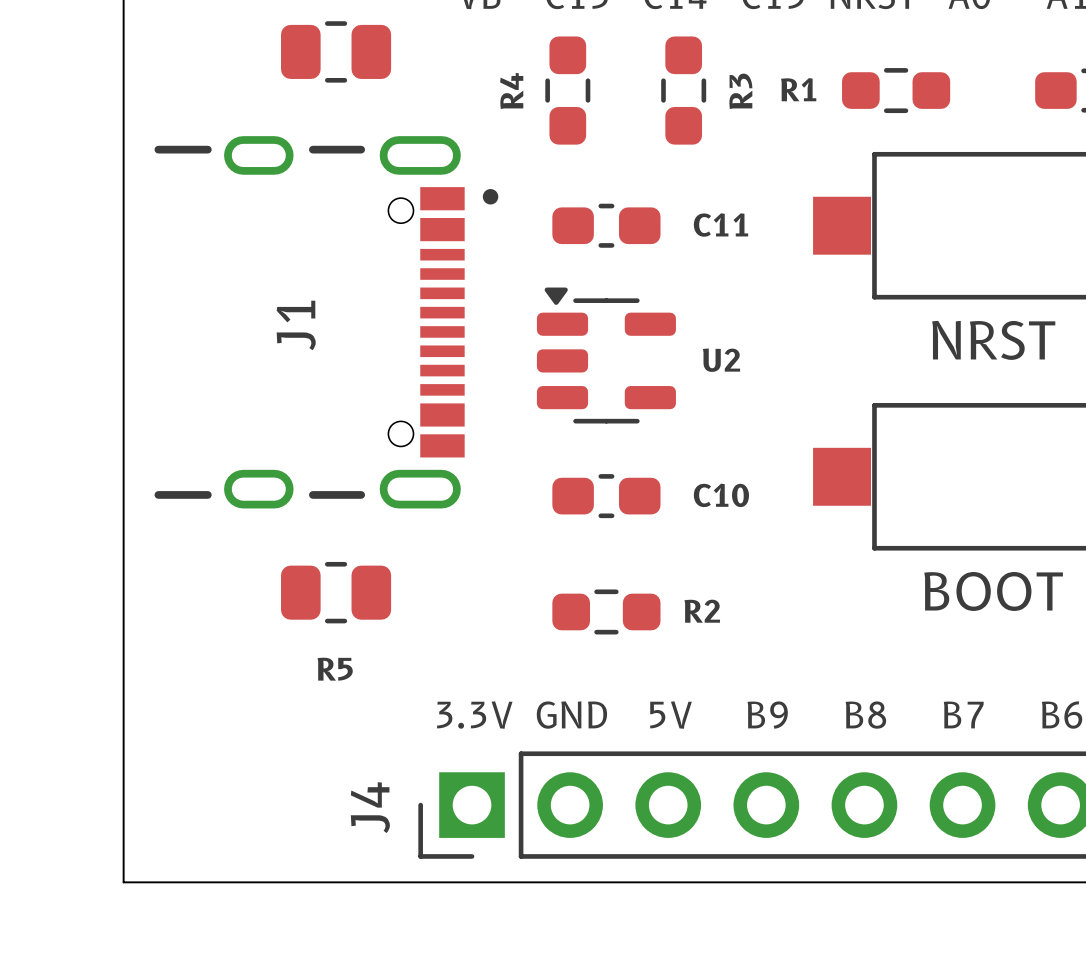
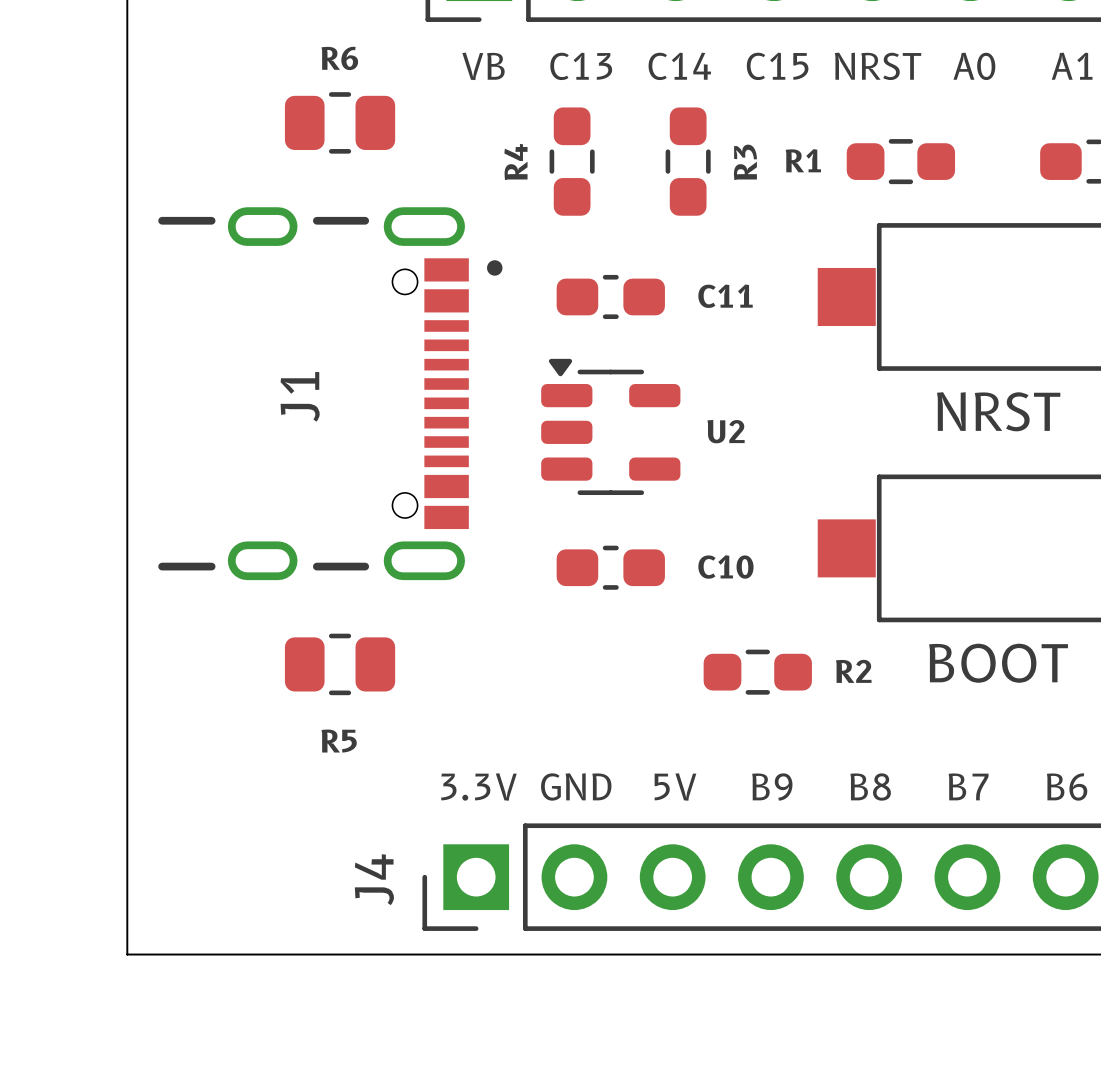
R2 position: (606, 611) -> (757, 672)

